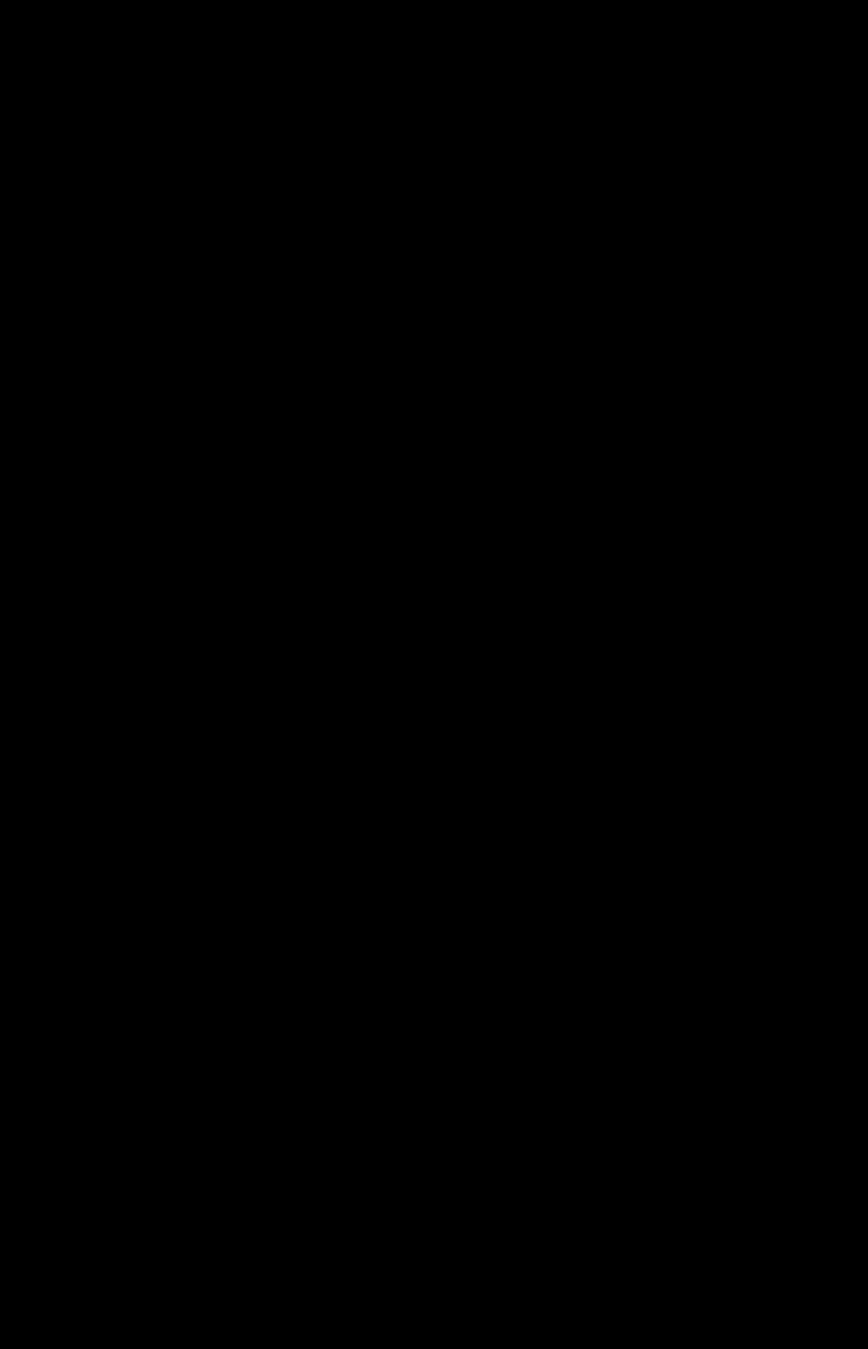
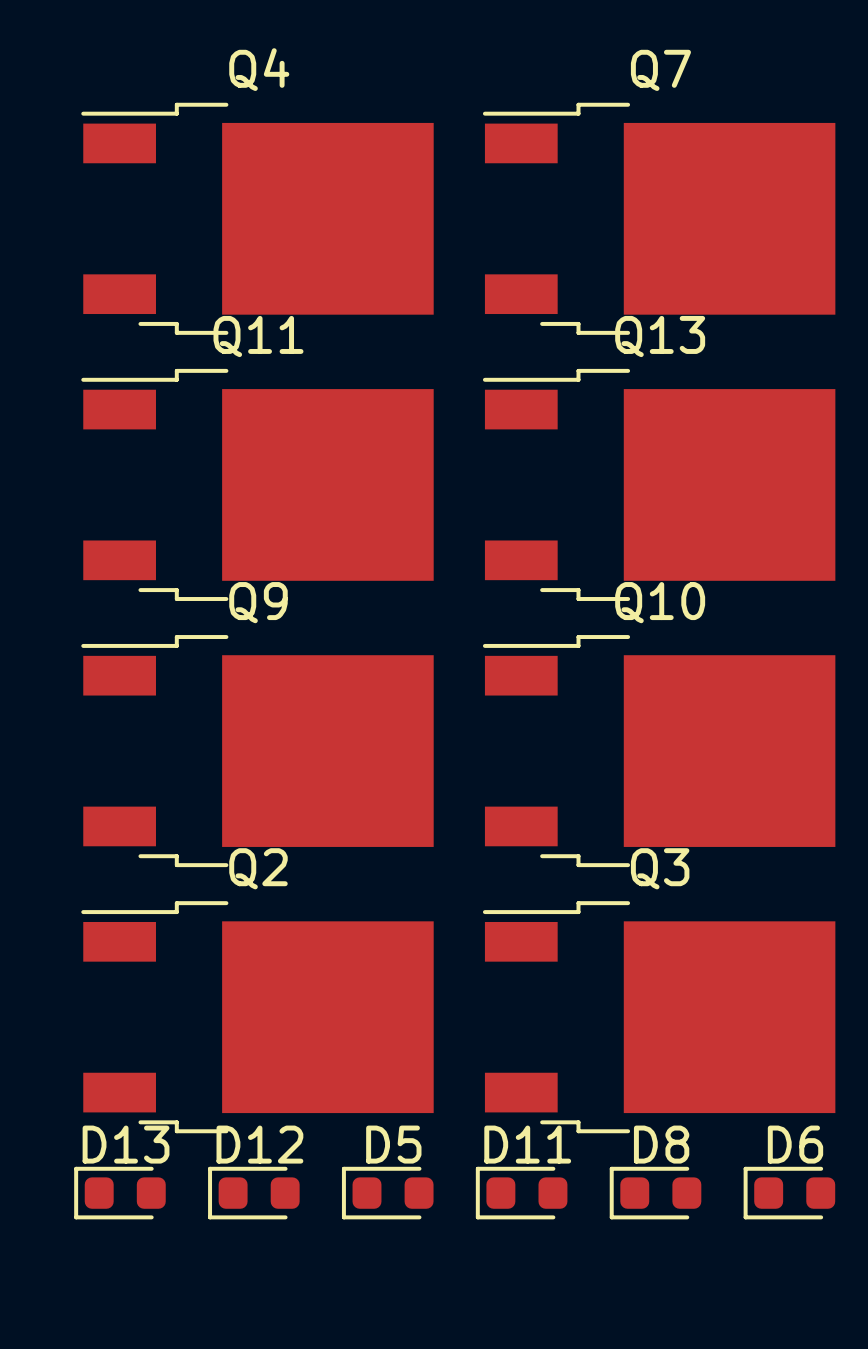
Q4: none -> (257, 218)
Q7: none -> (659, 218)
Q11: none -> (257, 484)
Q13: none -> (659, 484)
Q9: none -> (257, 751)
Q10: none -> (659, 751)
Q2: none -> (257, 1017)
Q3: none -> (659, 1017)
D13: none -> (119, 1193)
D12: none -> (253, 1193)
D5: none -> (387, 1193)
D11: none -> (521, 1193)
D8: none -> (655, 1193)
D6: none -> (789, 1193)

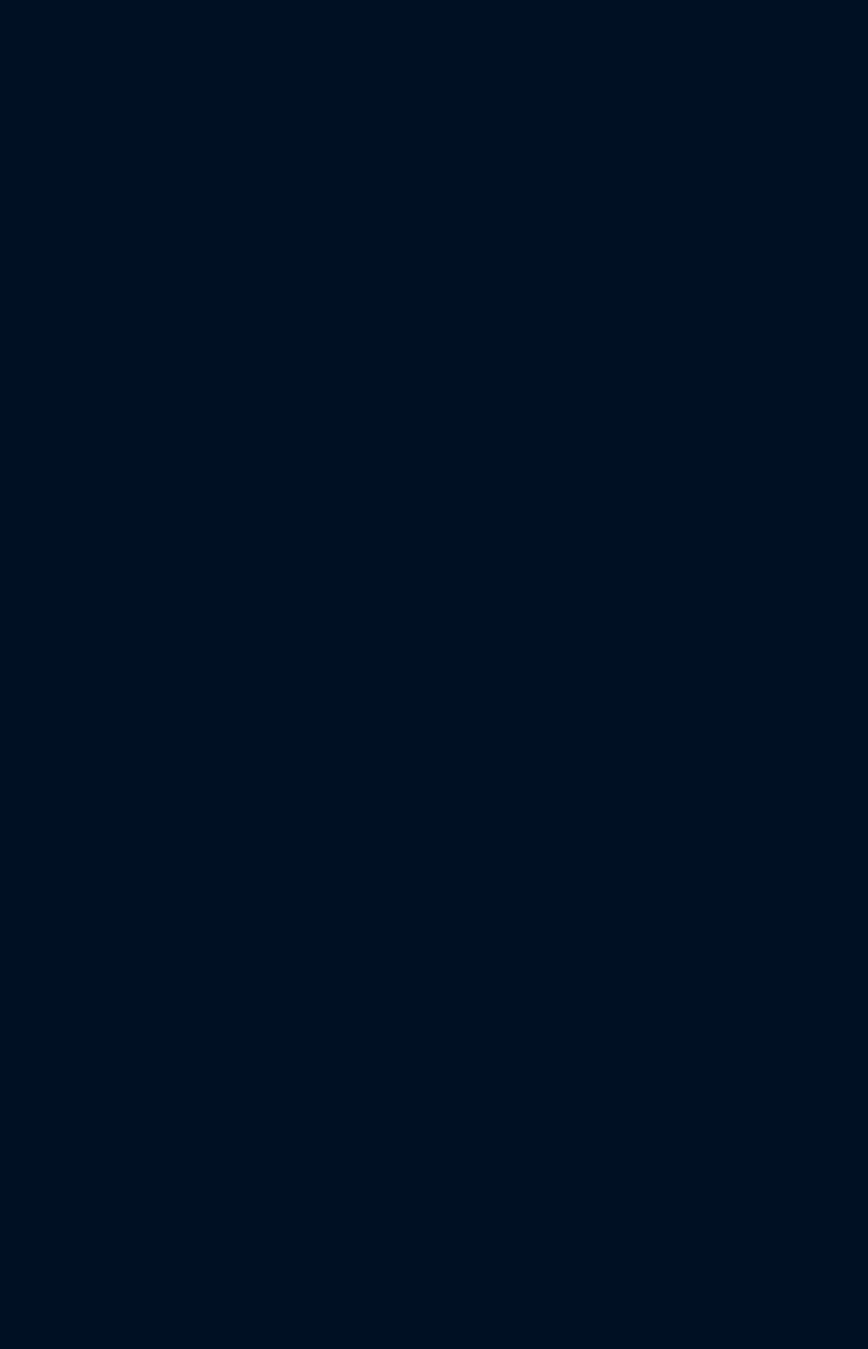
Q4: (257, 218) -> none
Q7: (659, 218) -> none
Q11: (257, 484) -> none
Q13: (659, 484) -> none
Q9: (257, 751) -> none
Q10: (659, 751) -> none
Q2: (257, 1017) -> none
Q3: (659, 1017) -> none
D13: (119, 1193) -> none
D12: (253, 1193) -> none
D5: (387, 1193) -> none
D11: (521, 1193) -> none
D8: (655, 1193) -> none
D6: (789, 1193) -> none

